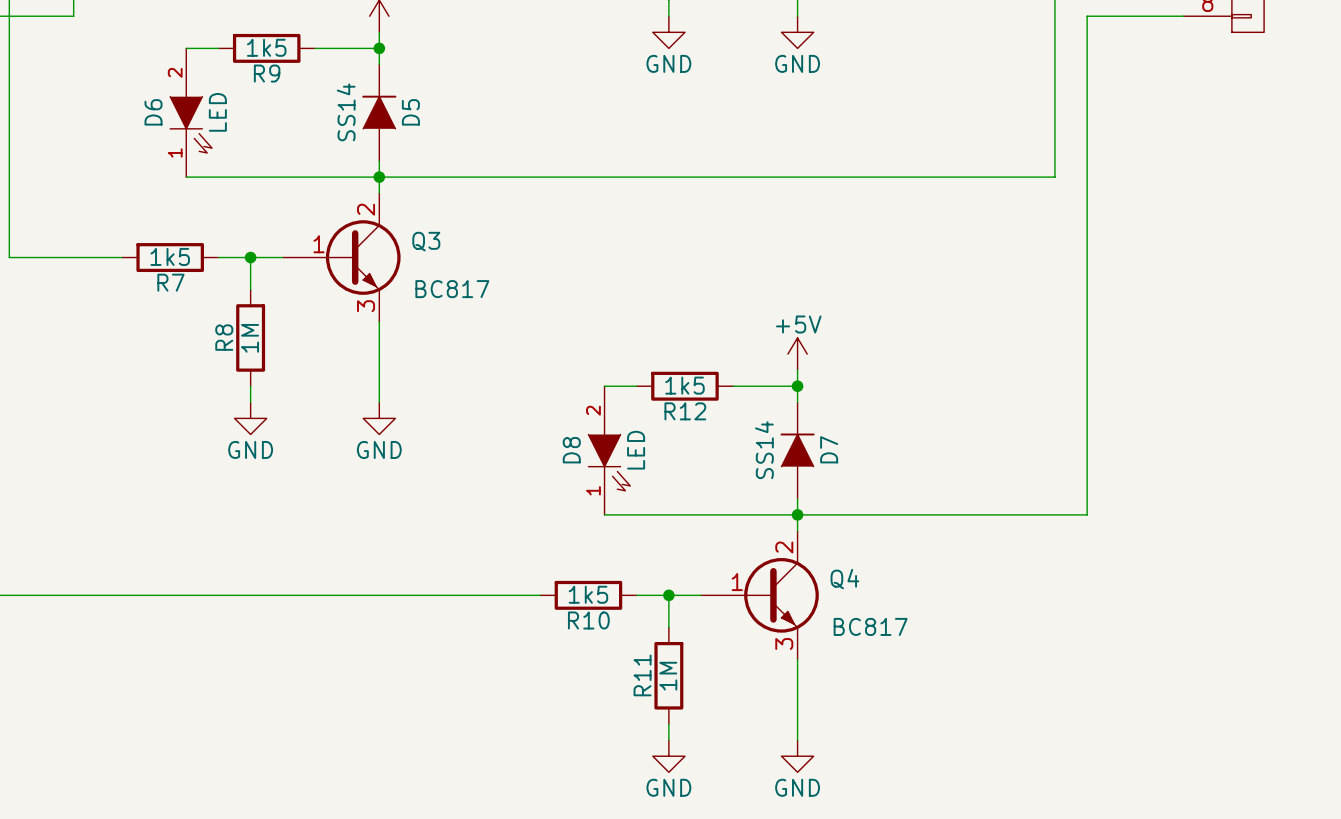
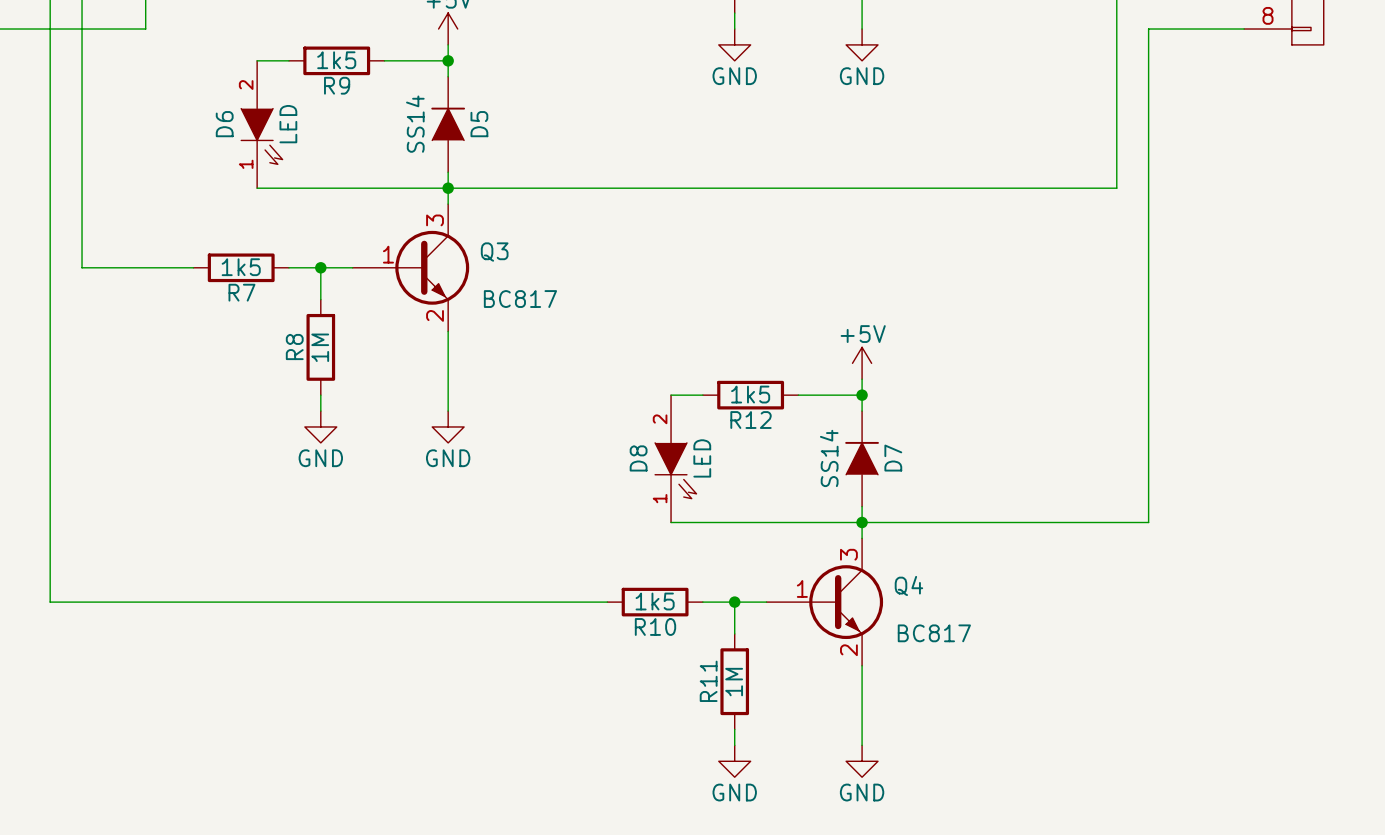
Q3 pin number: 2 (366, 209) -> 3 (435, 220)
Q3 pin number: 3 (366, 306) -> 2 (435, 315)
Q4 pin number: 2 (784, 547) -> 3 (848, 554)
Q4 pin number: 3 (784, 643) -> 2 (848, 650)

